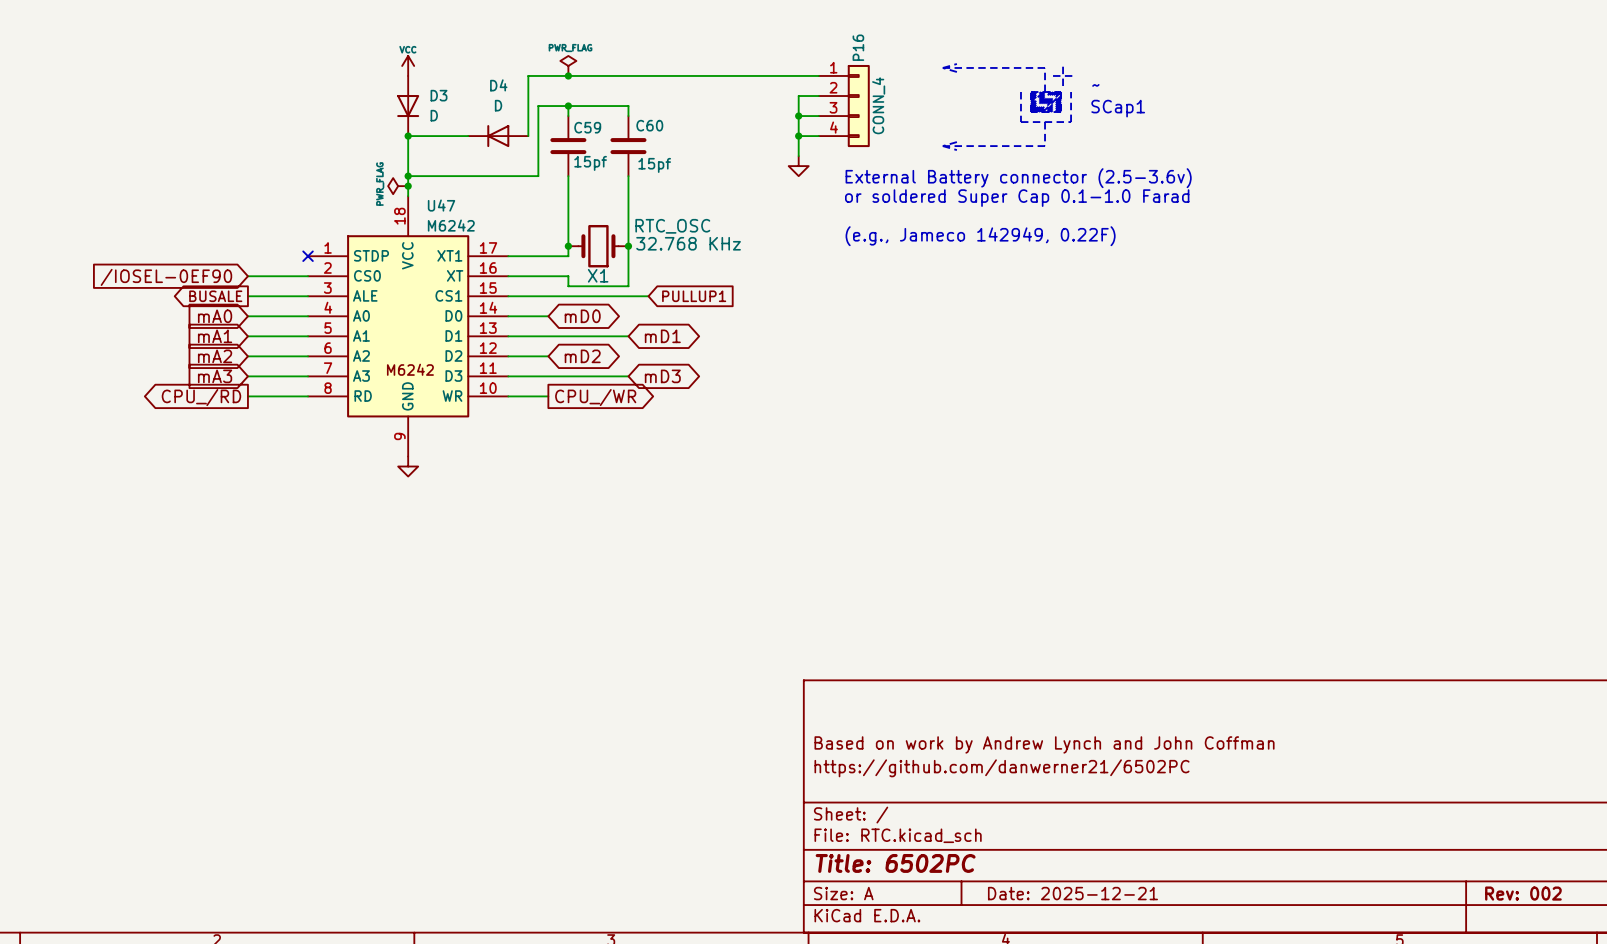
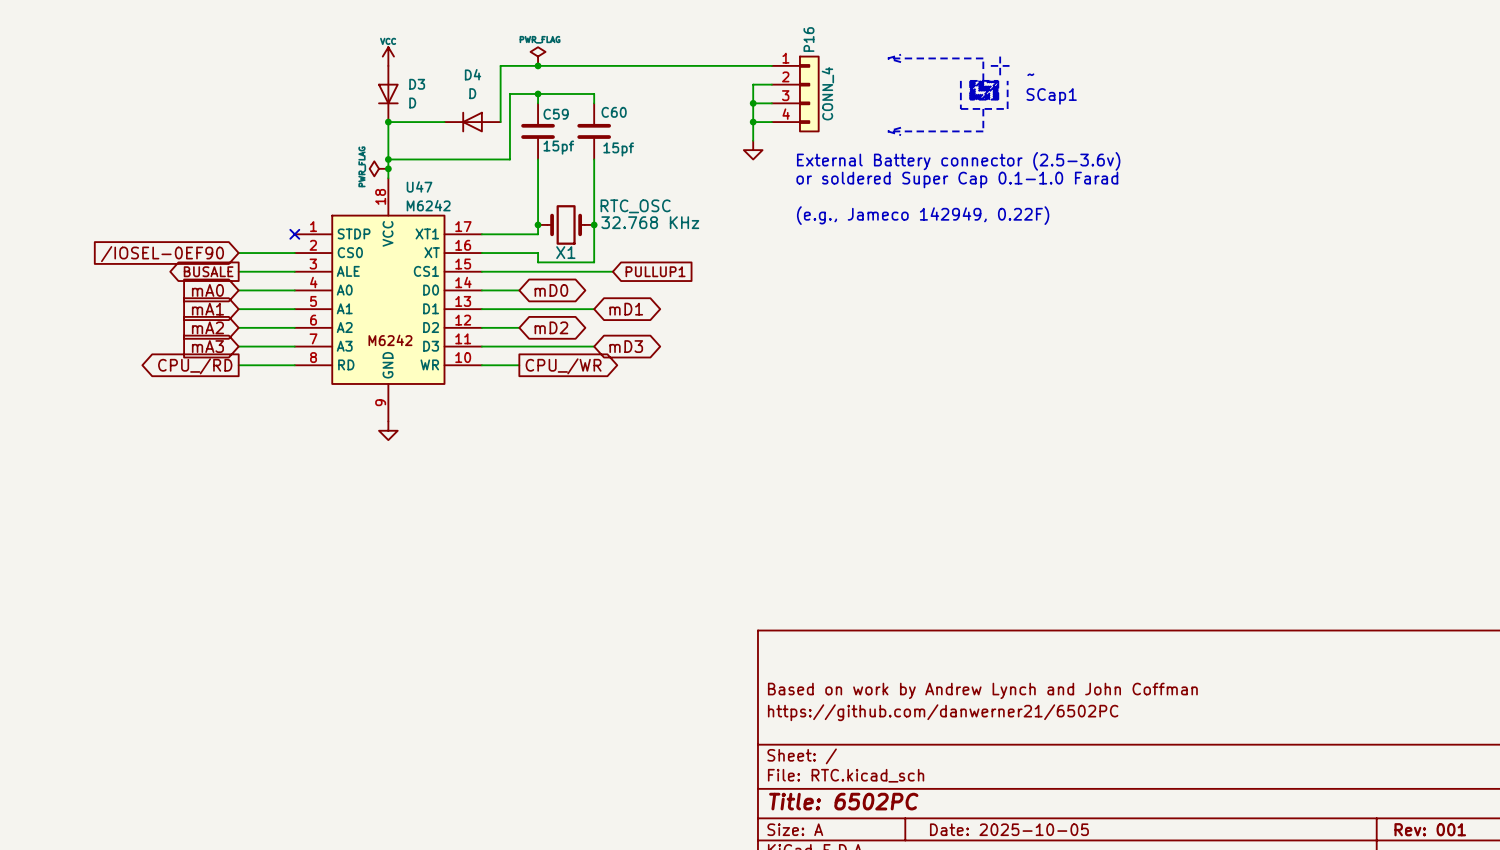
title block: Date: 2025-12-21 (1072, 893) -> Date: 2025-10-05 (1009, 829)
title block: Rev: 002 (1523, 893) -> Rev: 001 (1430, 829)

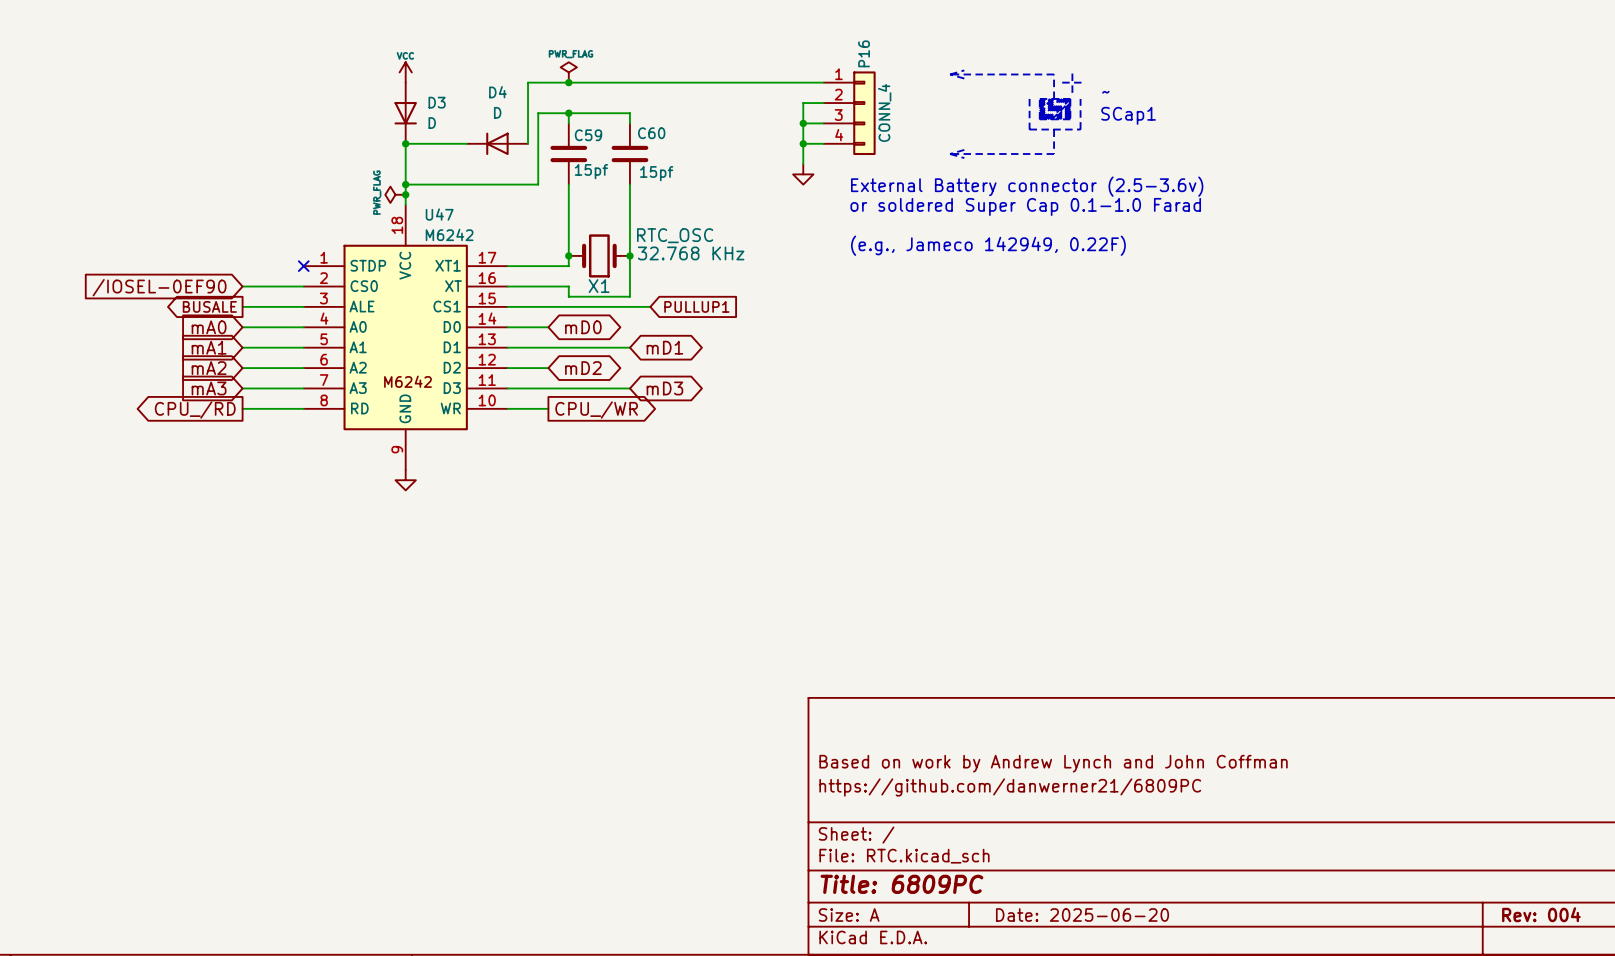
title block: https://github.com/danwerner21/6502PC (943, 712) -> https://github.com/danwerner21/6809PC (1010, 787)
title block: Title: 6502PC (843, 801) -> Title: 6809PC (901, 884)
title block: Date: 2025-10-05 (1009, 829) -> Date: 2025-06-20 (1082, 914)
title block: Rev: 001 (1430, 829) -> Rev: 004 (1541, 914)

